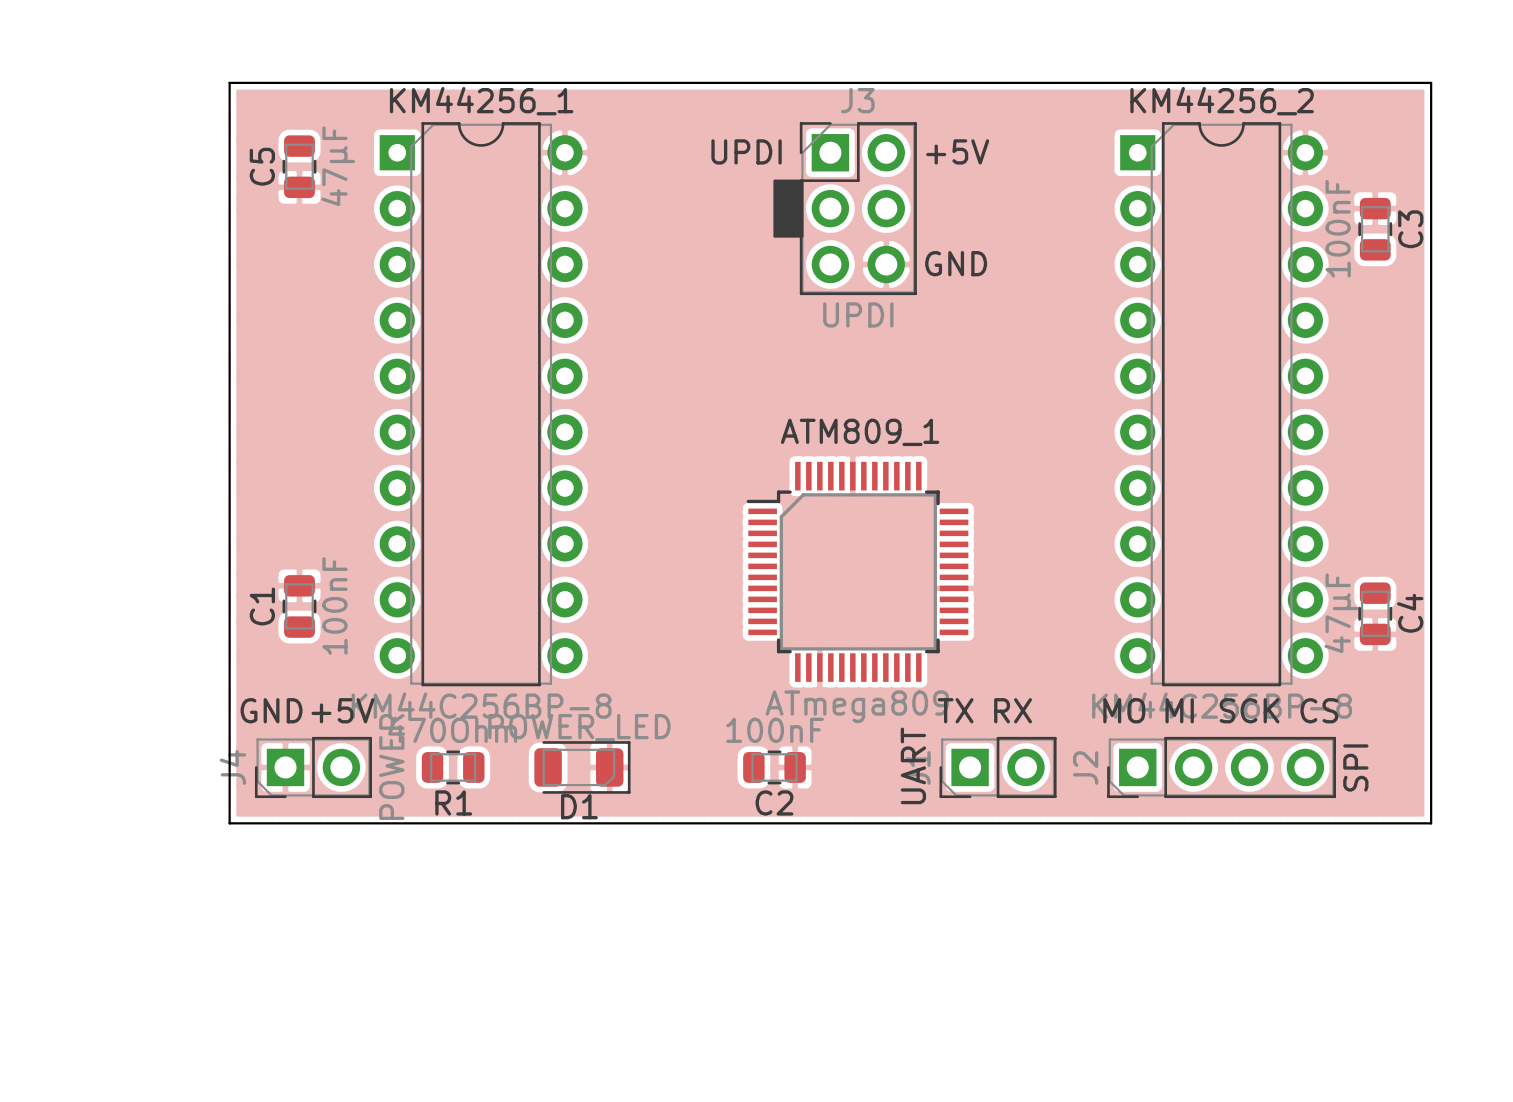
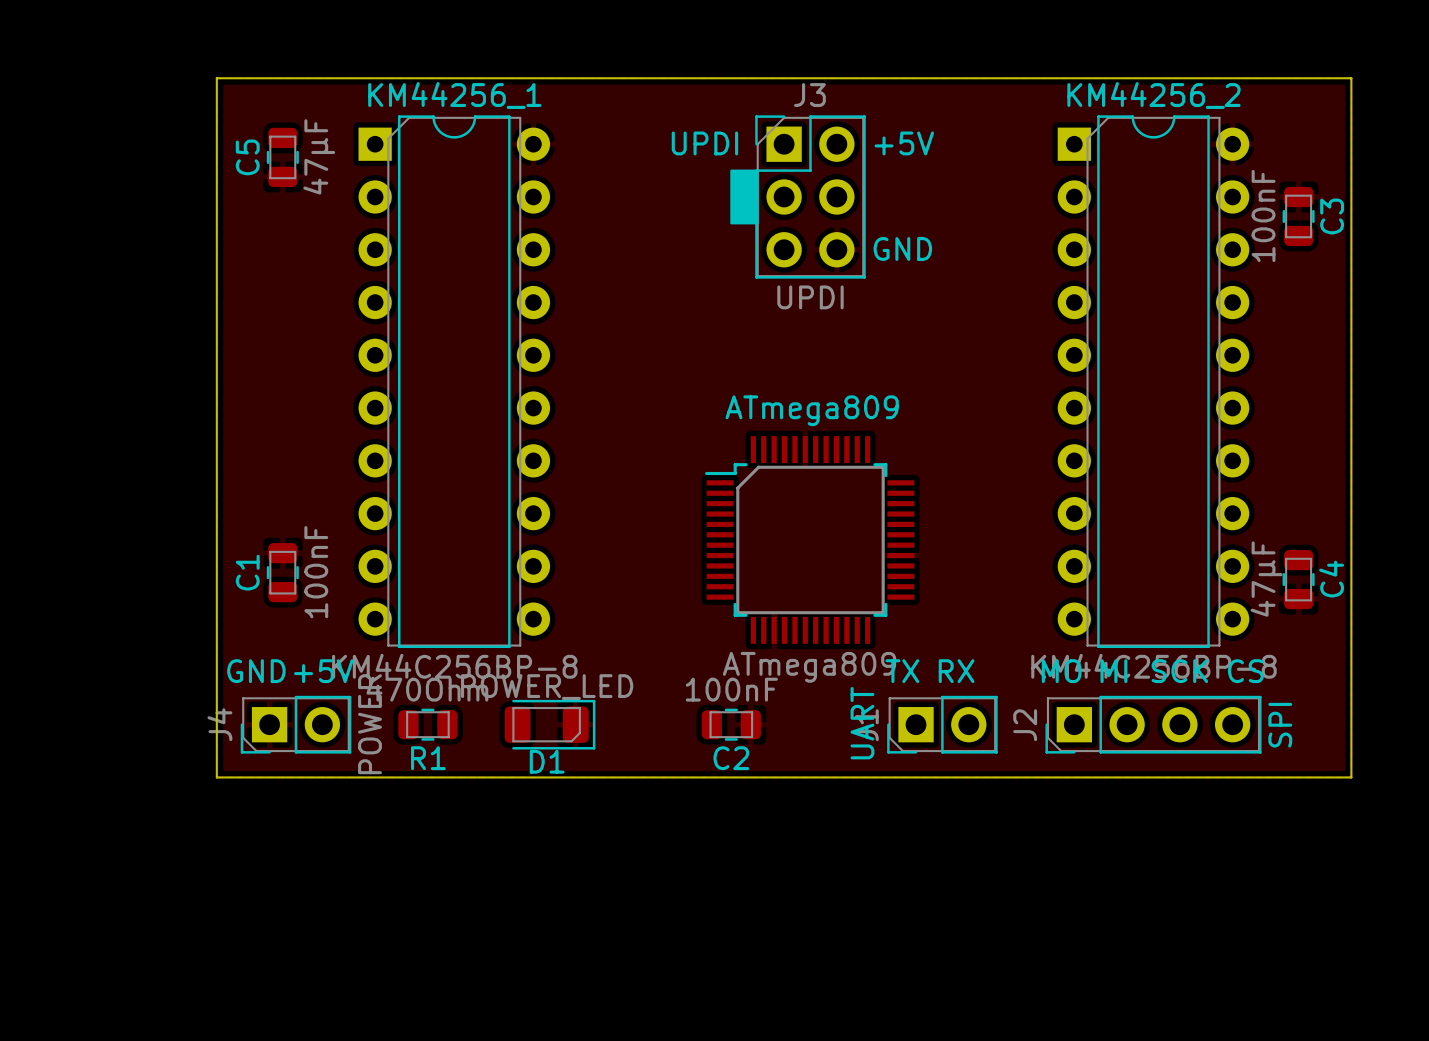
ATM809_1 name: ATM809_1 (860, 432) -> ATmega809 (812, 410)

